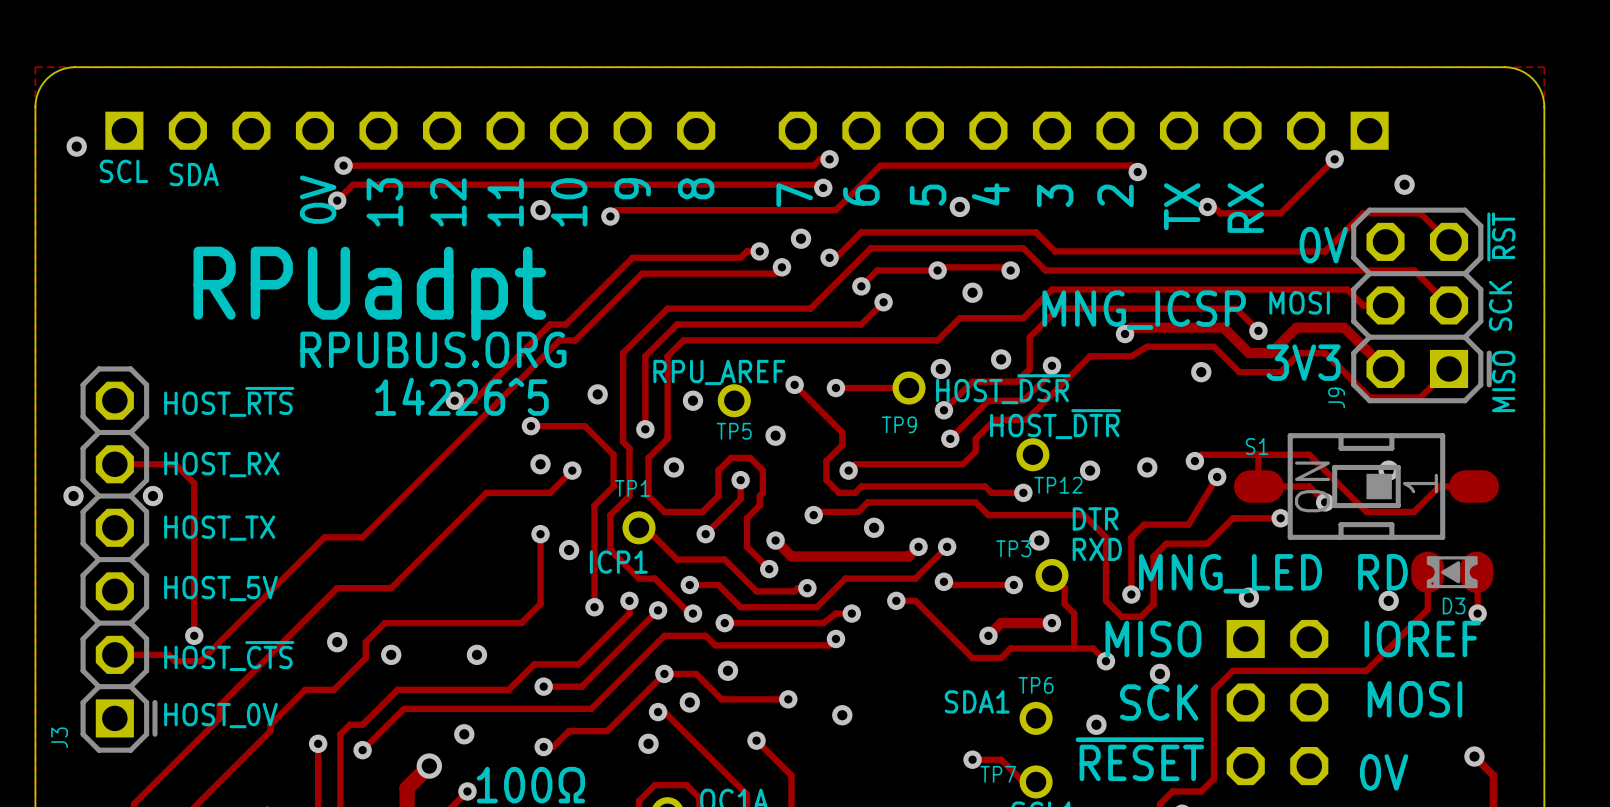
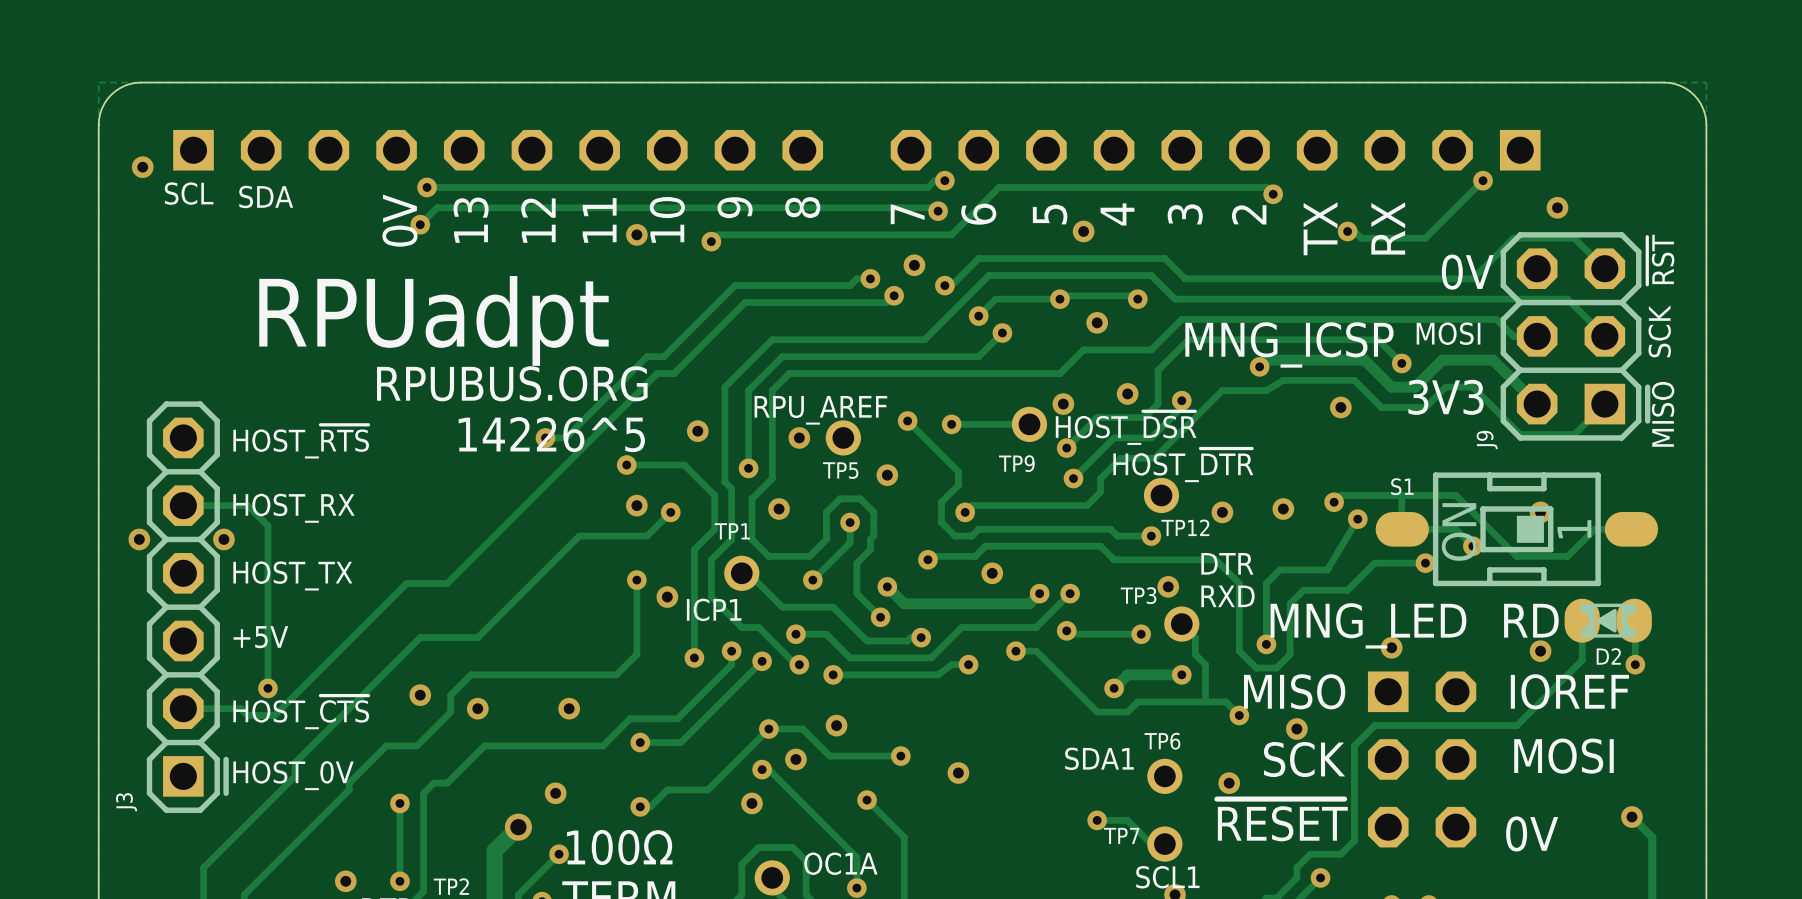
text: HOST_5V (221, 588) -> +5V (260, 637)
D3 name: D3 (1454, 605) -> D2 (1608, 656)
track: (835, 638) (829, 645) (715, 645) (705, 635) (664, 635) (591, 708) (403, 708) (362, 750) -> none
via: (835, 638) -> none
via: (362, 750) -> none

